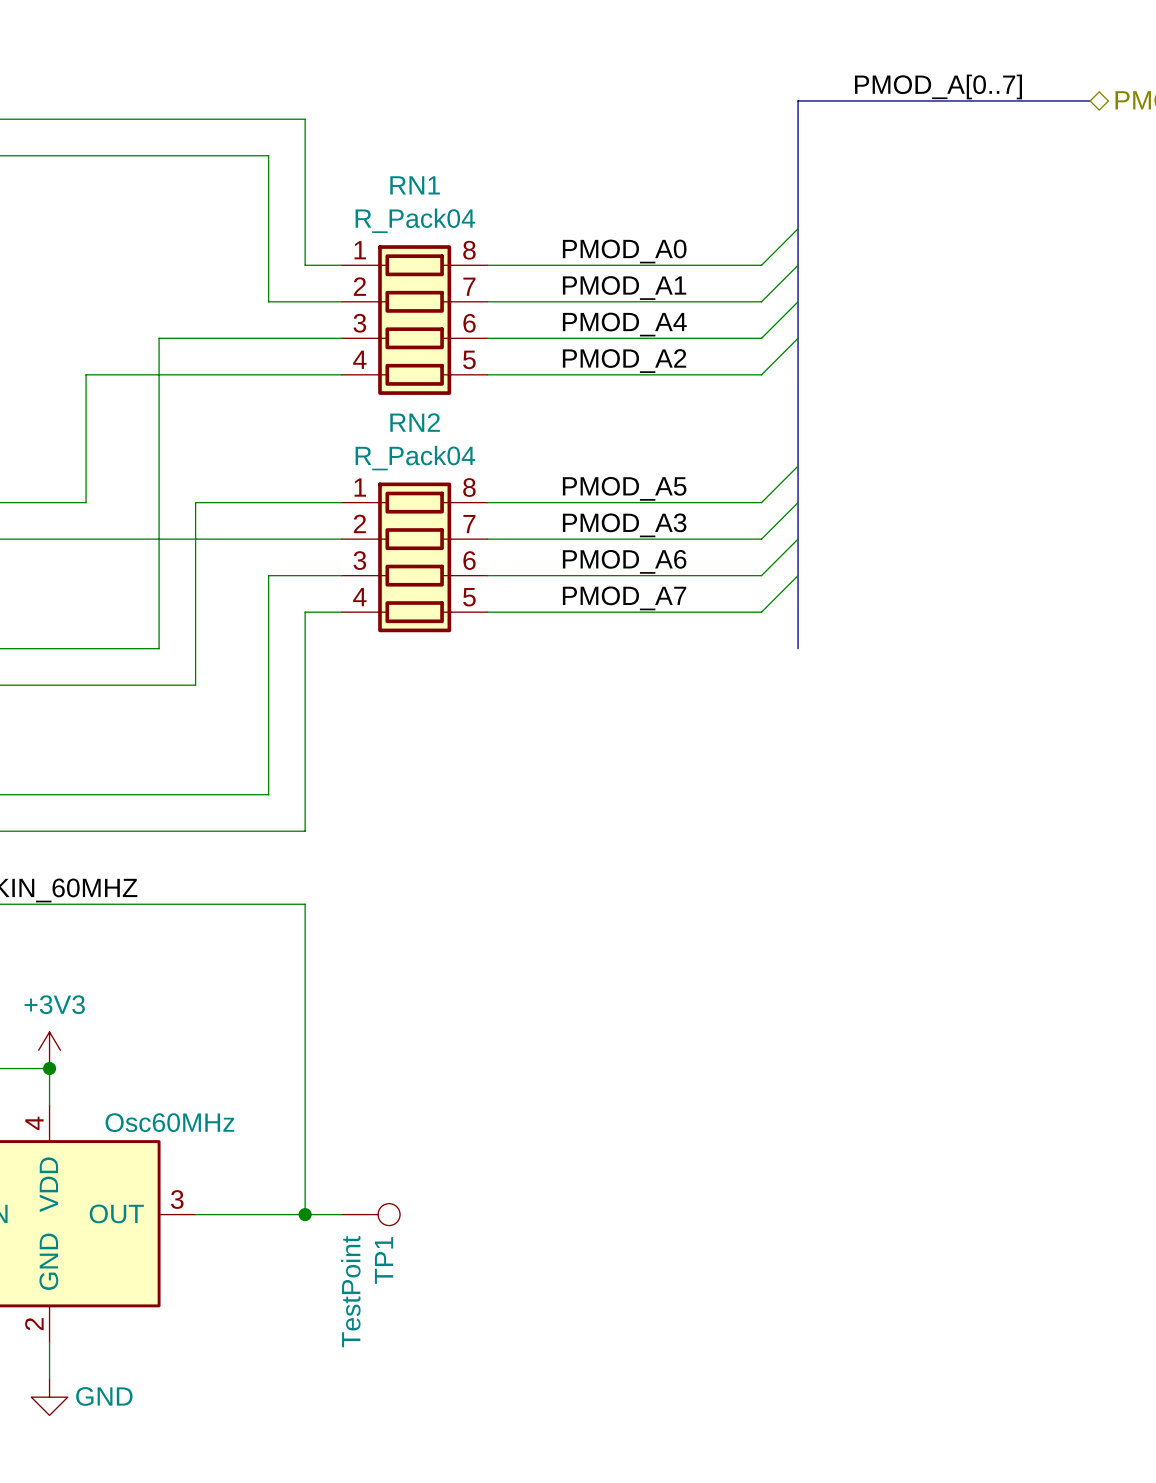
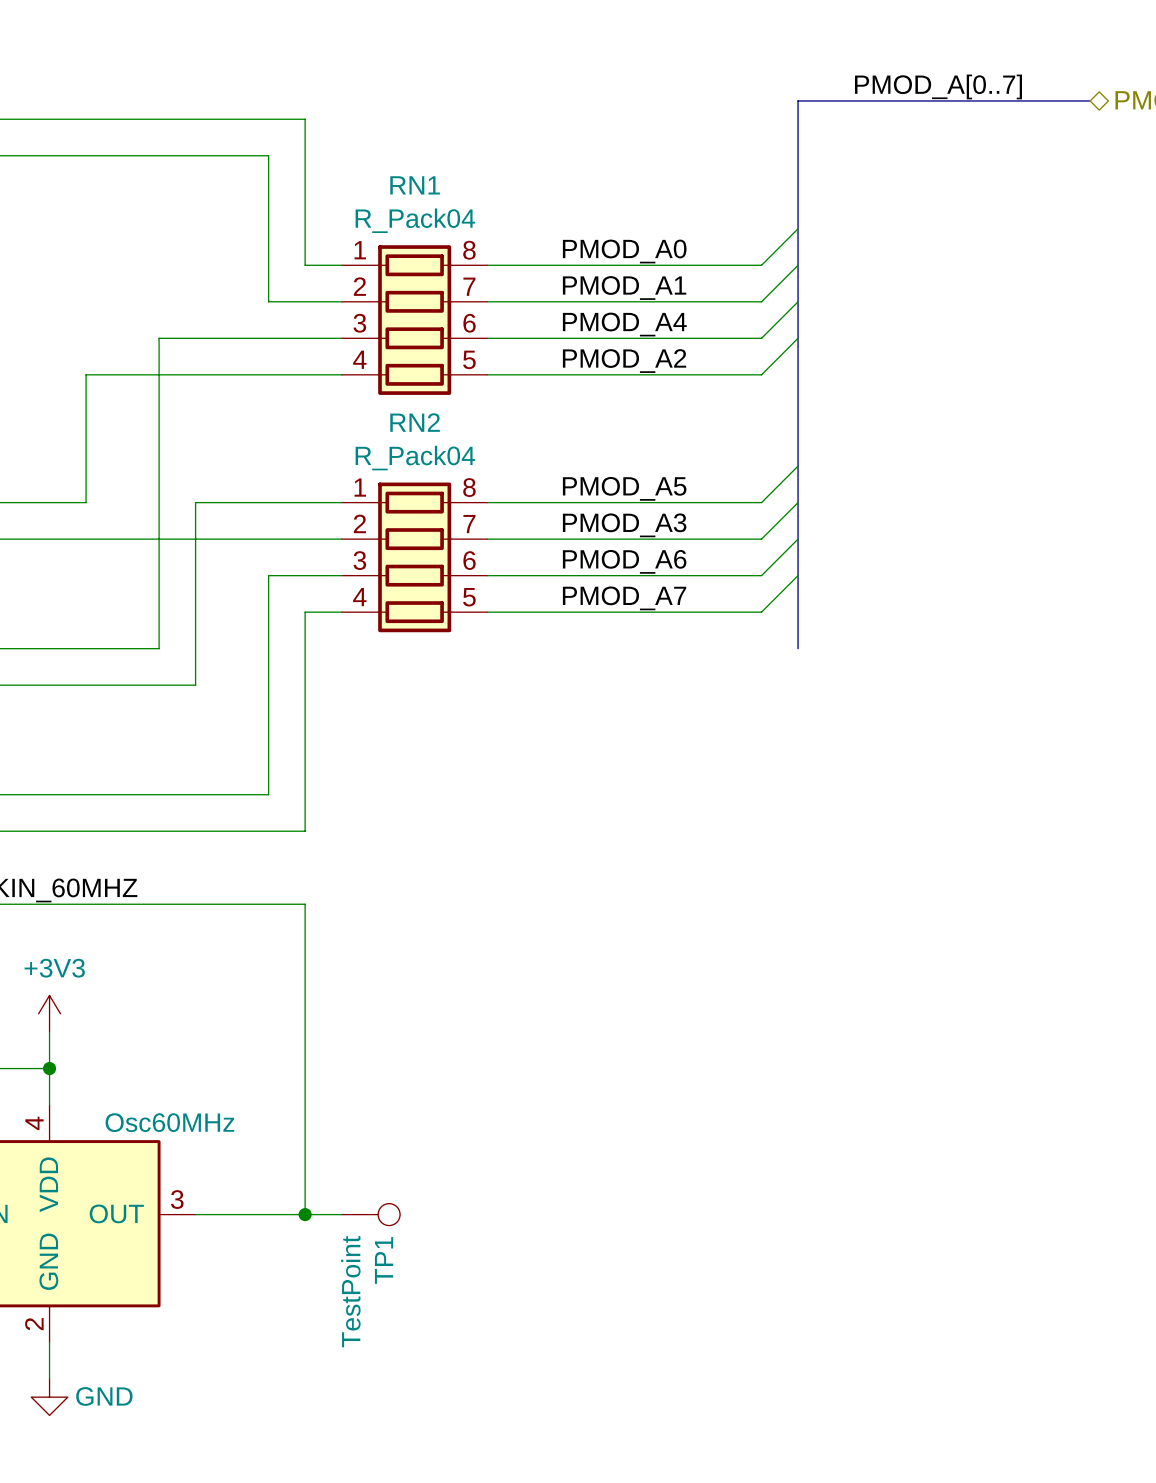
power symbol position: +3V3 (49, 1050) -> +3V3 (49, 1013)

